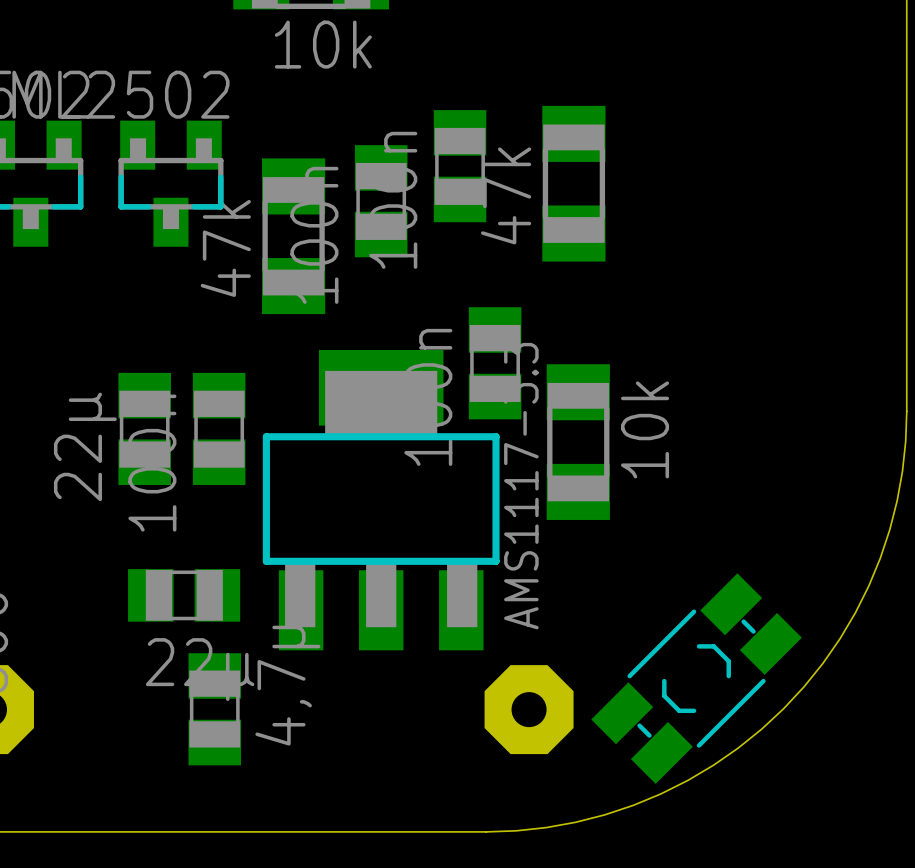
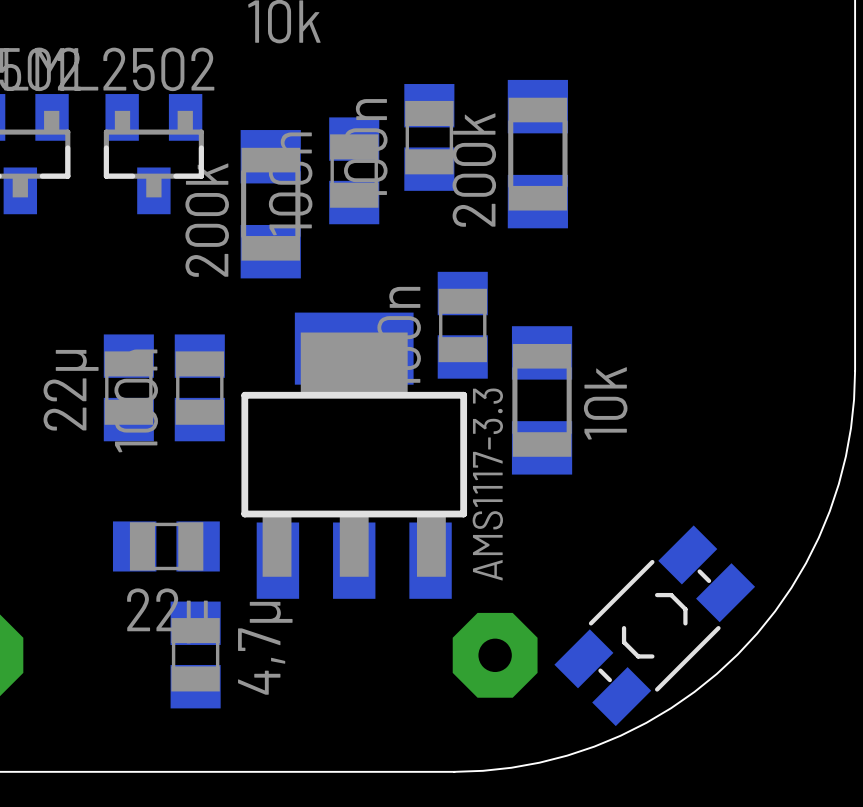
part value: 47k (506, 195) -> 200k (474, 170)
part value: 47k (225, 248) -> 200k (207, 220)

